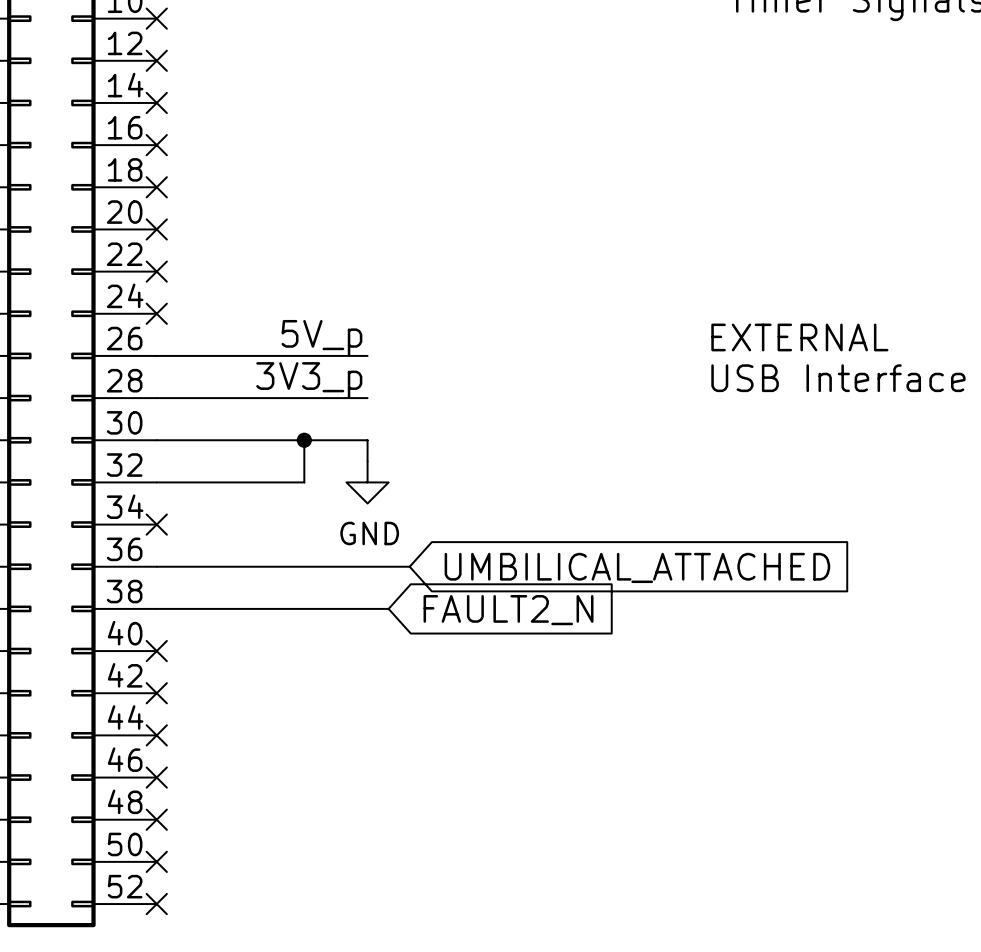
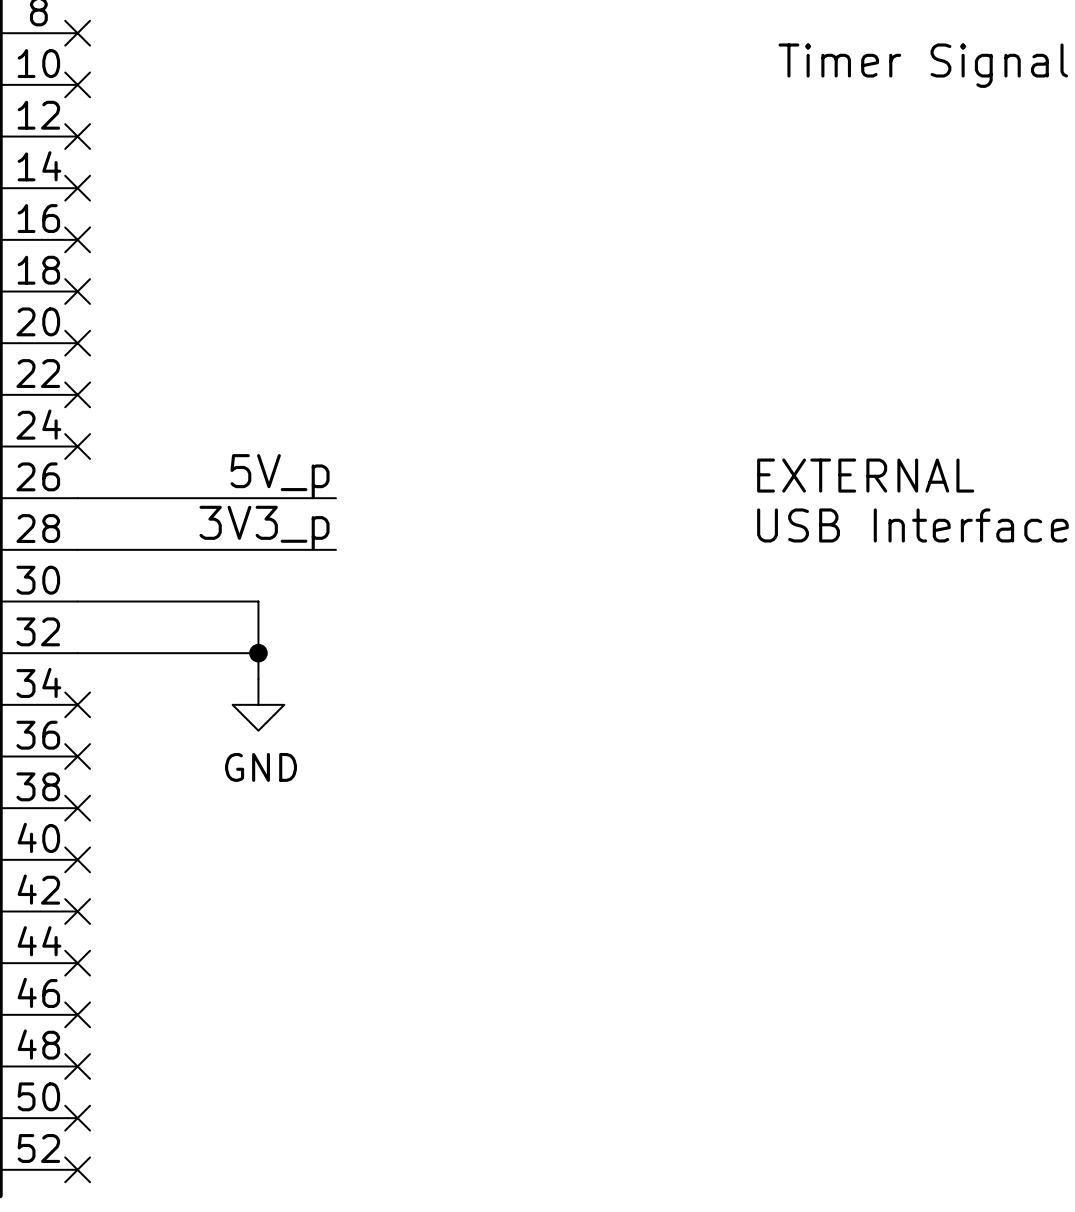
wire: (304, 440) (367, 440) (367, 461) -> none
junction position: (304, 440) -> (258, 653)
wire: none -> (258, 653) (258, 679)
power symbol position: GND (367, 482) -> GND (258, 704)
wire: (156, 566) (409, 566) -> none
no-connect mark: none -> (77, 756)
global label: UMBILICAL_ATTACHED (637, 567) -> none
wire: (156, 608) (388, 608) -> none
no-connect mark: none -> (77, 808)
global label: FAULT2_N (508, 610) -> none

